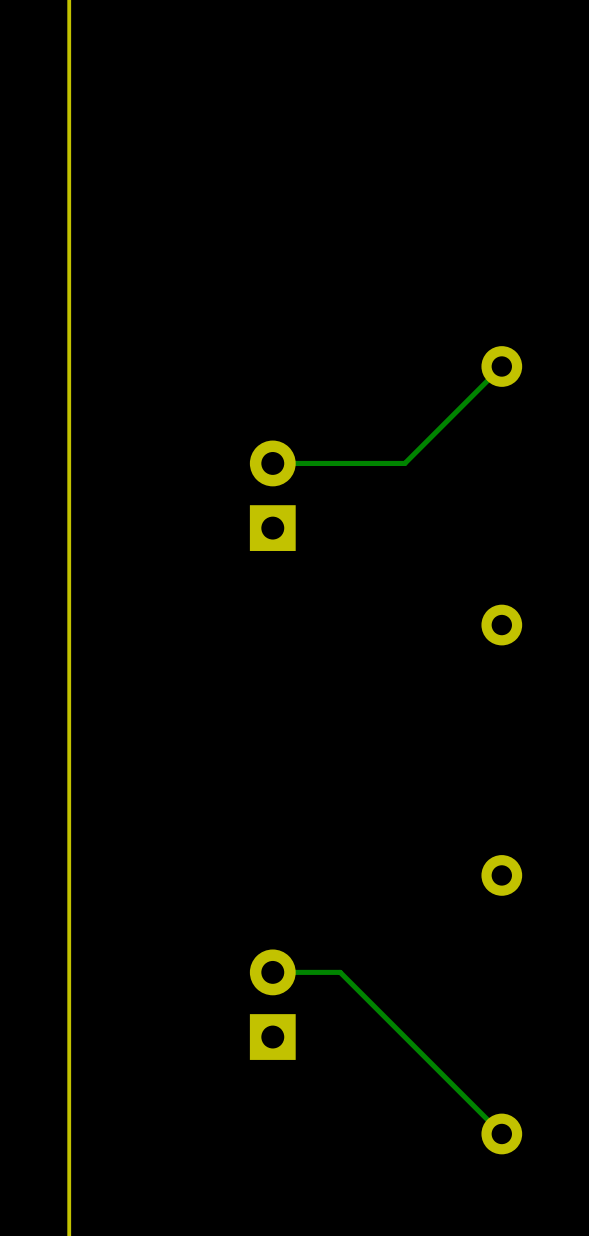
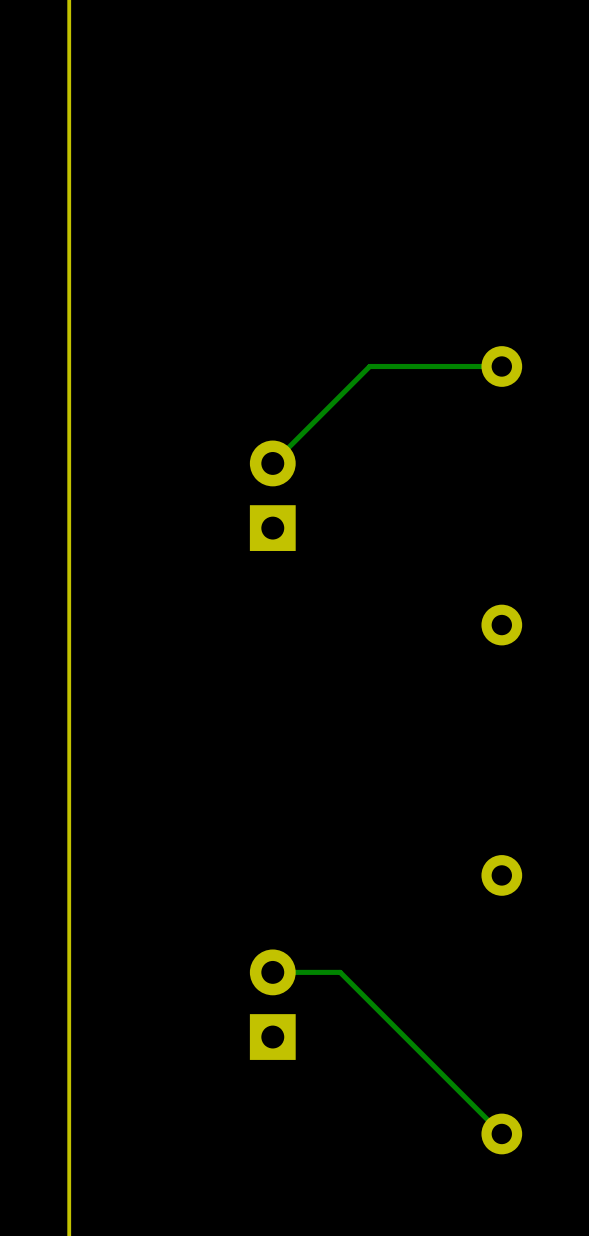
track: (501, 366) (404, 463) (272, 463) -> (501, 366) (369, 366) (272, 463)

